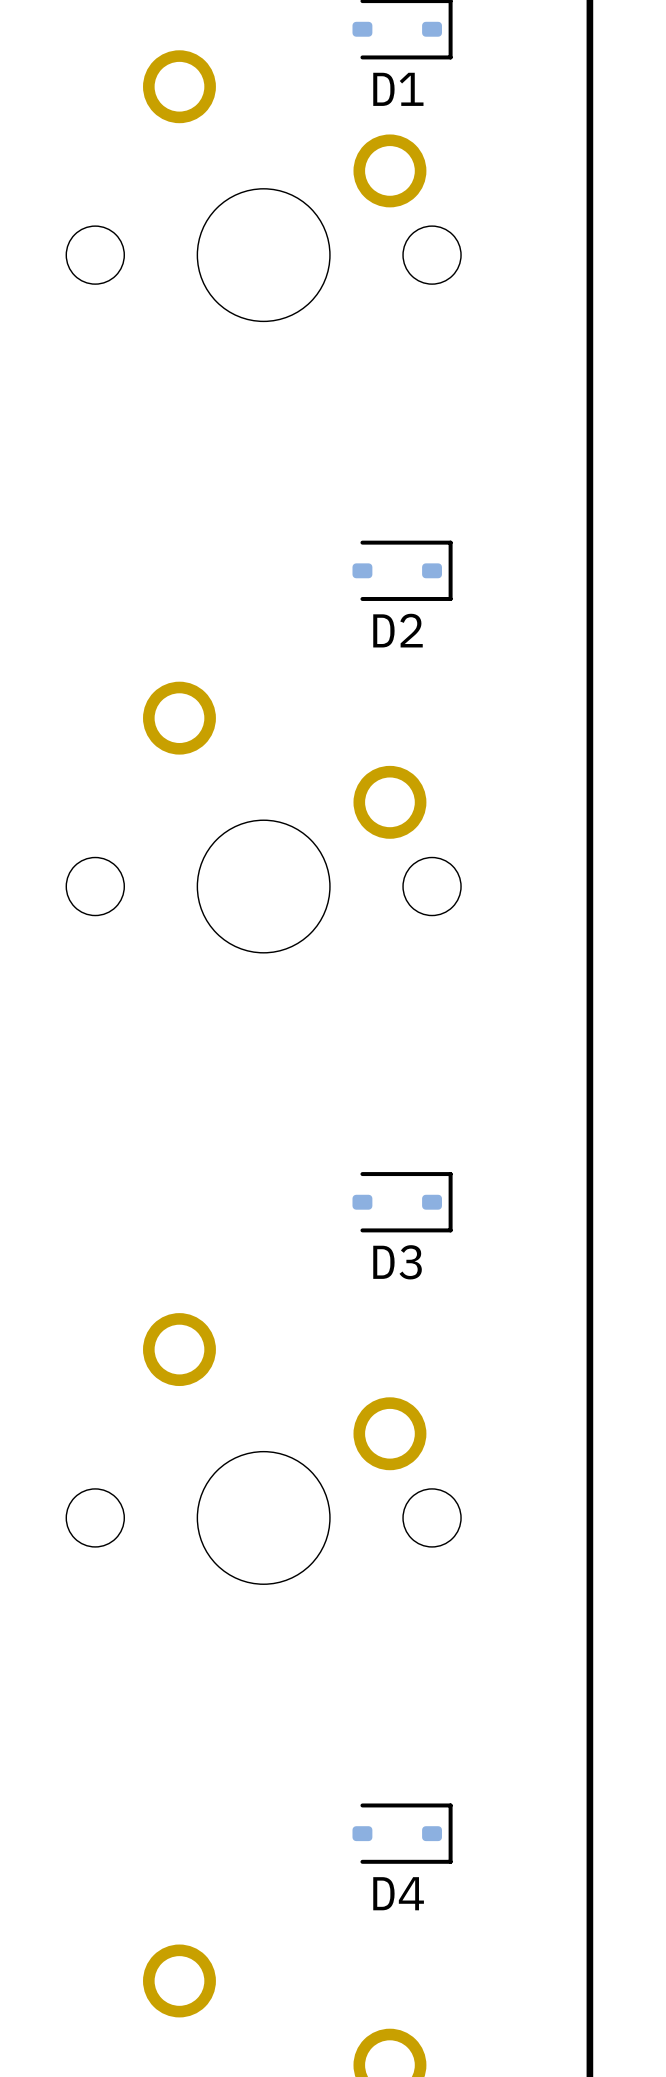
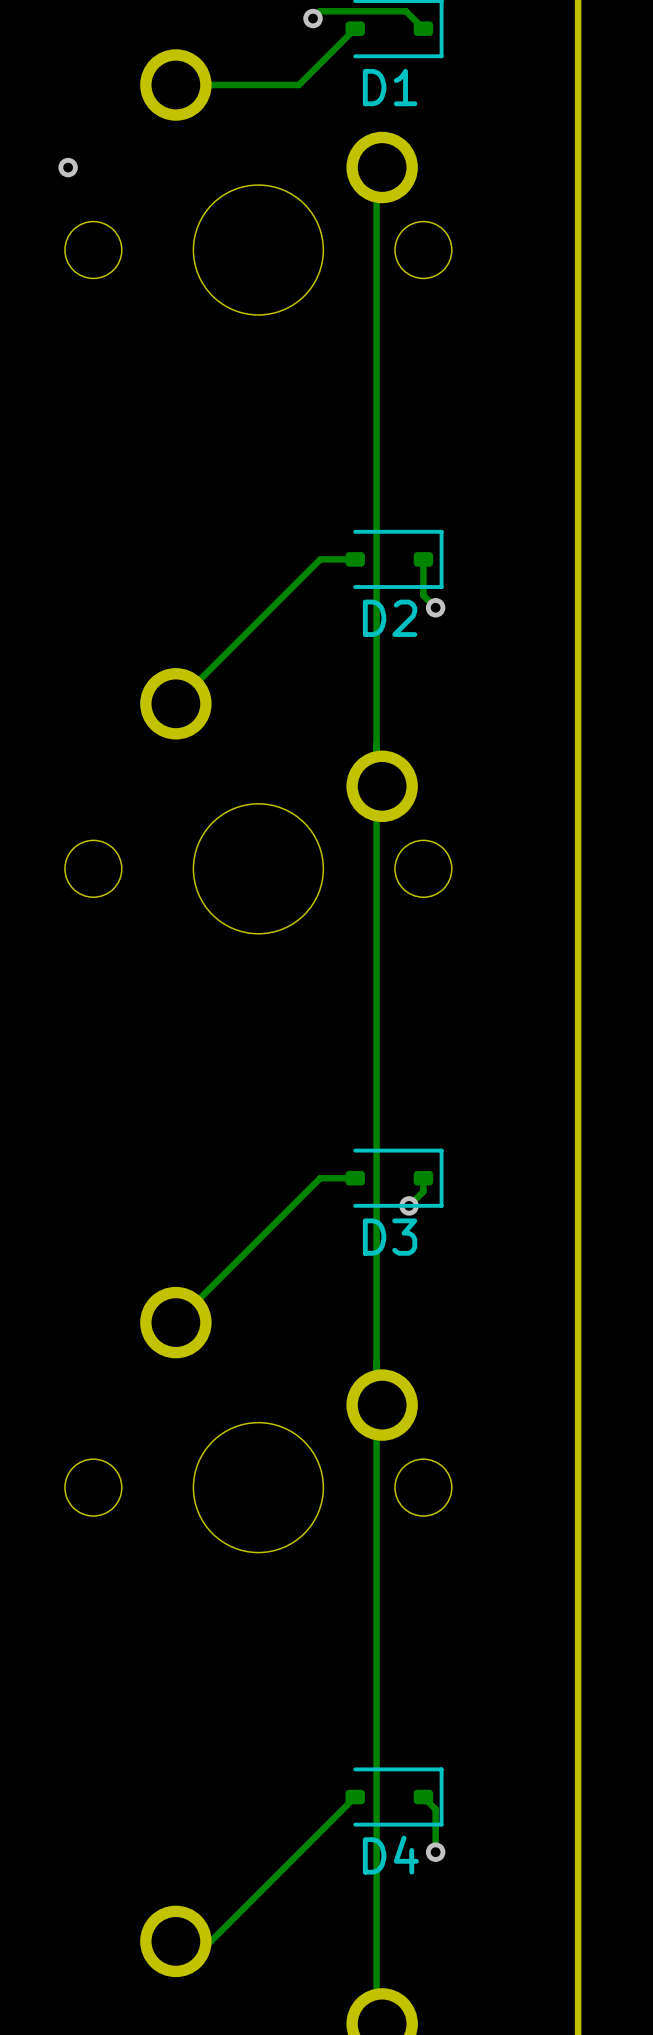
track: none -> (313, 18) (320, 11) (406, 11) (423, 28)
via: none -> (313, 18)
track: none -> (355, 28) (298, 85) (175, 85)
track: none -> (382, 167) (376, 173) (376, 2018) (382, 2023)
via: none -> (68, 167)
track: none -> (355, 559) (320, 559) (175, 703)
track: none -> (423, 559) (423, 595) (435, 607)
via: none -> (435, 607)
track: none -> (355, 1178) (320, 1178) (175, 1322)
track: none -> (423, 1178) (423, 1191) (409, 1205)
via: none -> (409, 1205)
track: none -> (355, 1797) (210, 1941) (175, 1941)
track: none -> (423, 1797) (435, 1809) (435, 1852)
via: none -> (435, 1852)

